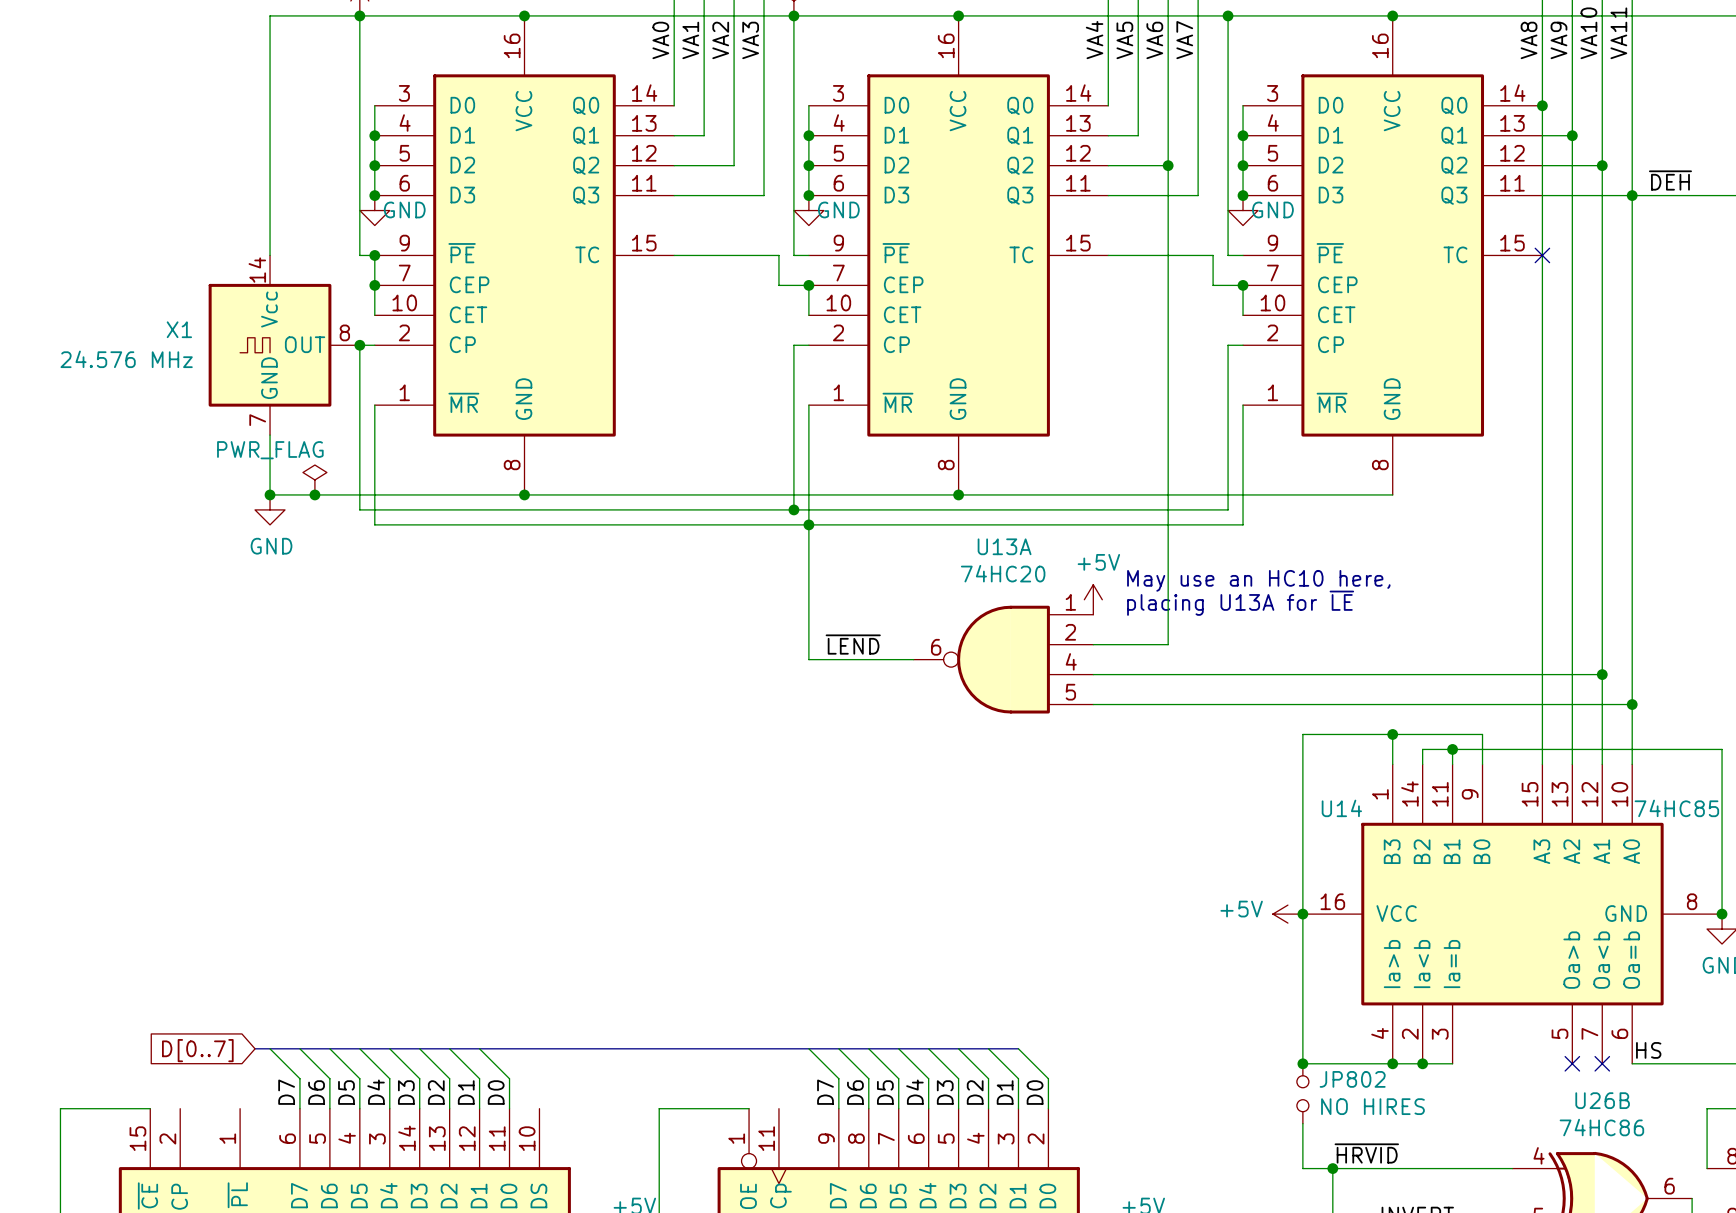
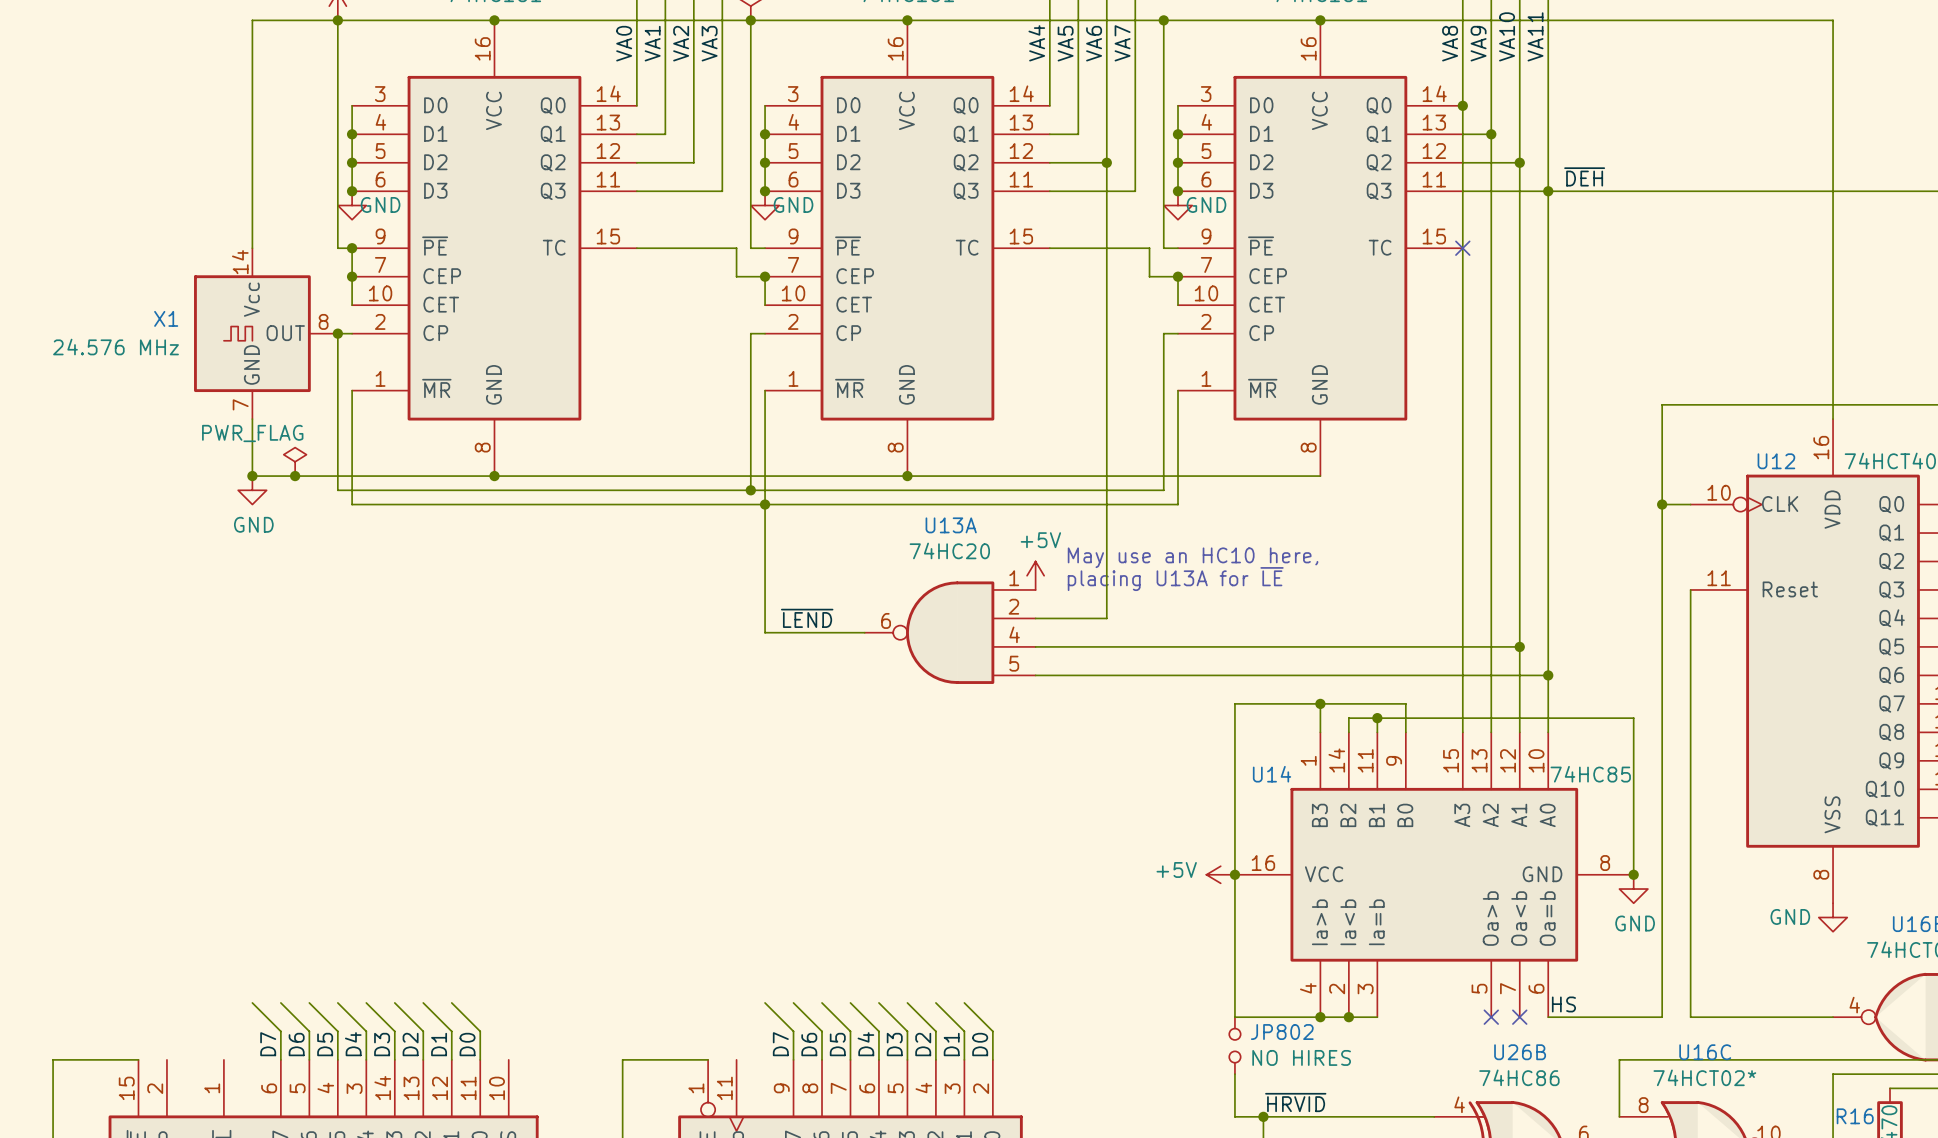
bus: (255, 1048) (1018, 1048) -> none
global label: D[0..7] (197, 1050) -> none
junction: (1302, 1063) -> none

